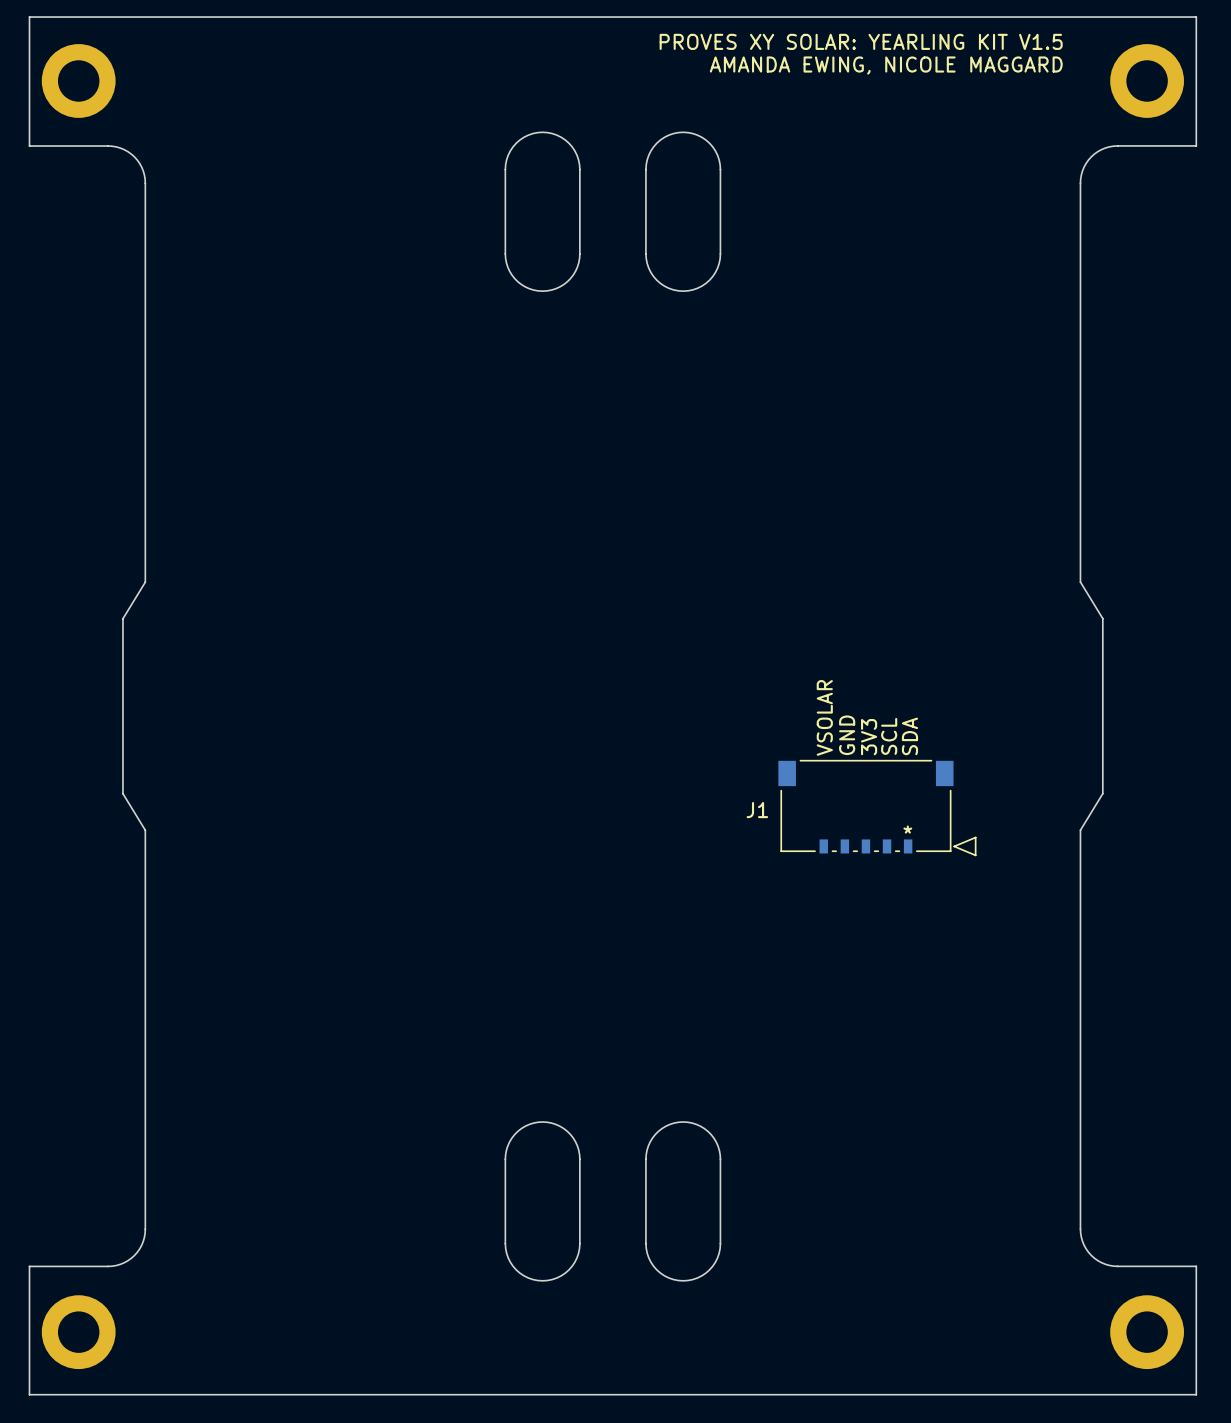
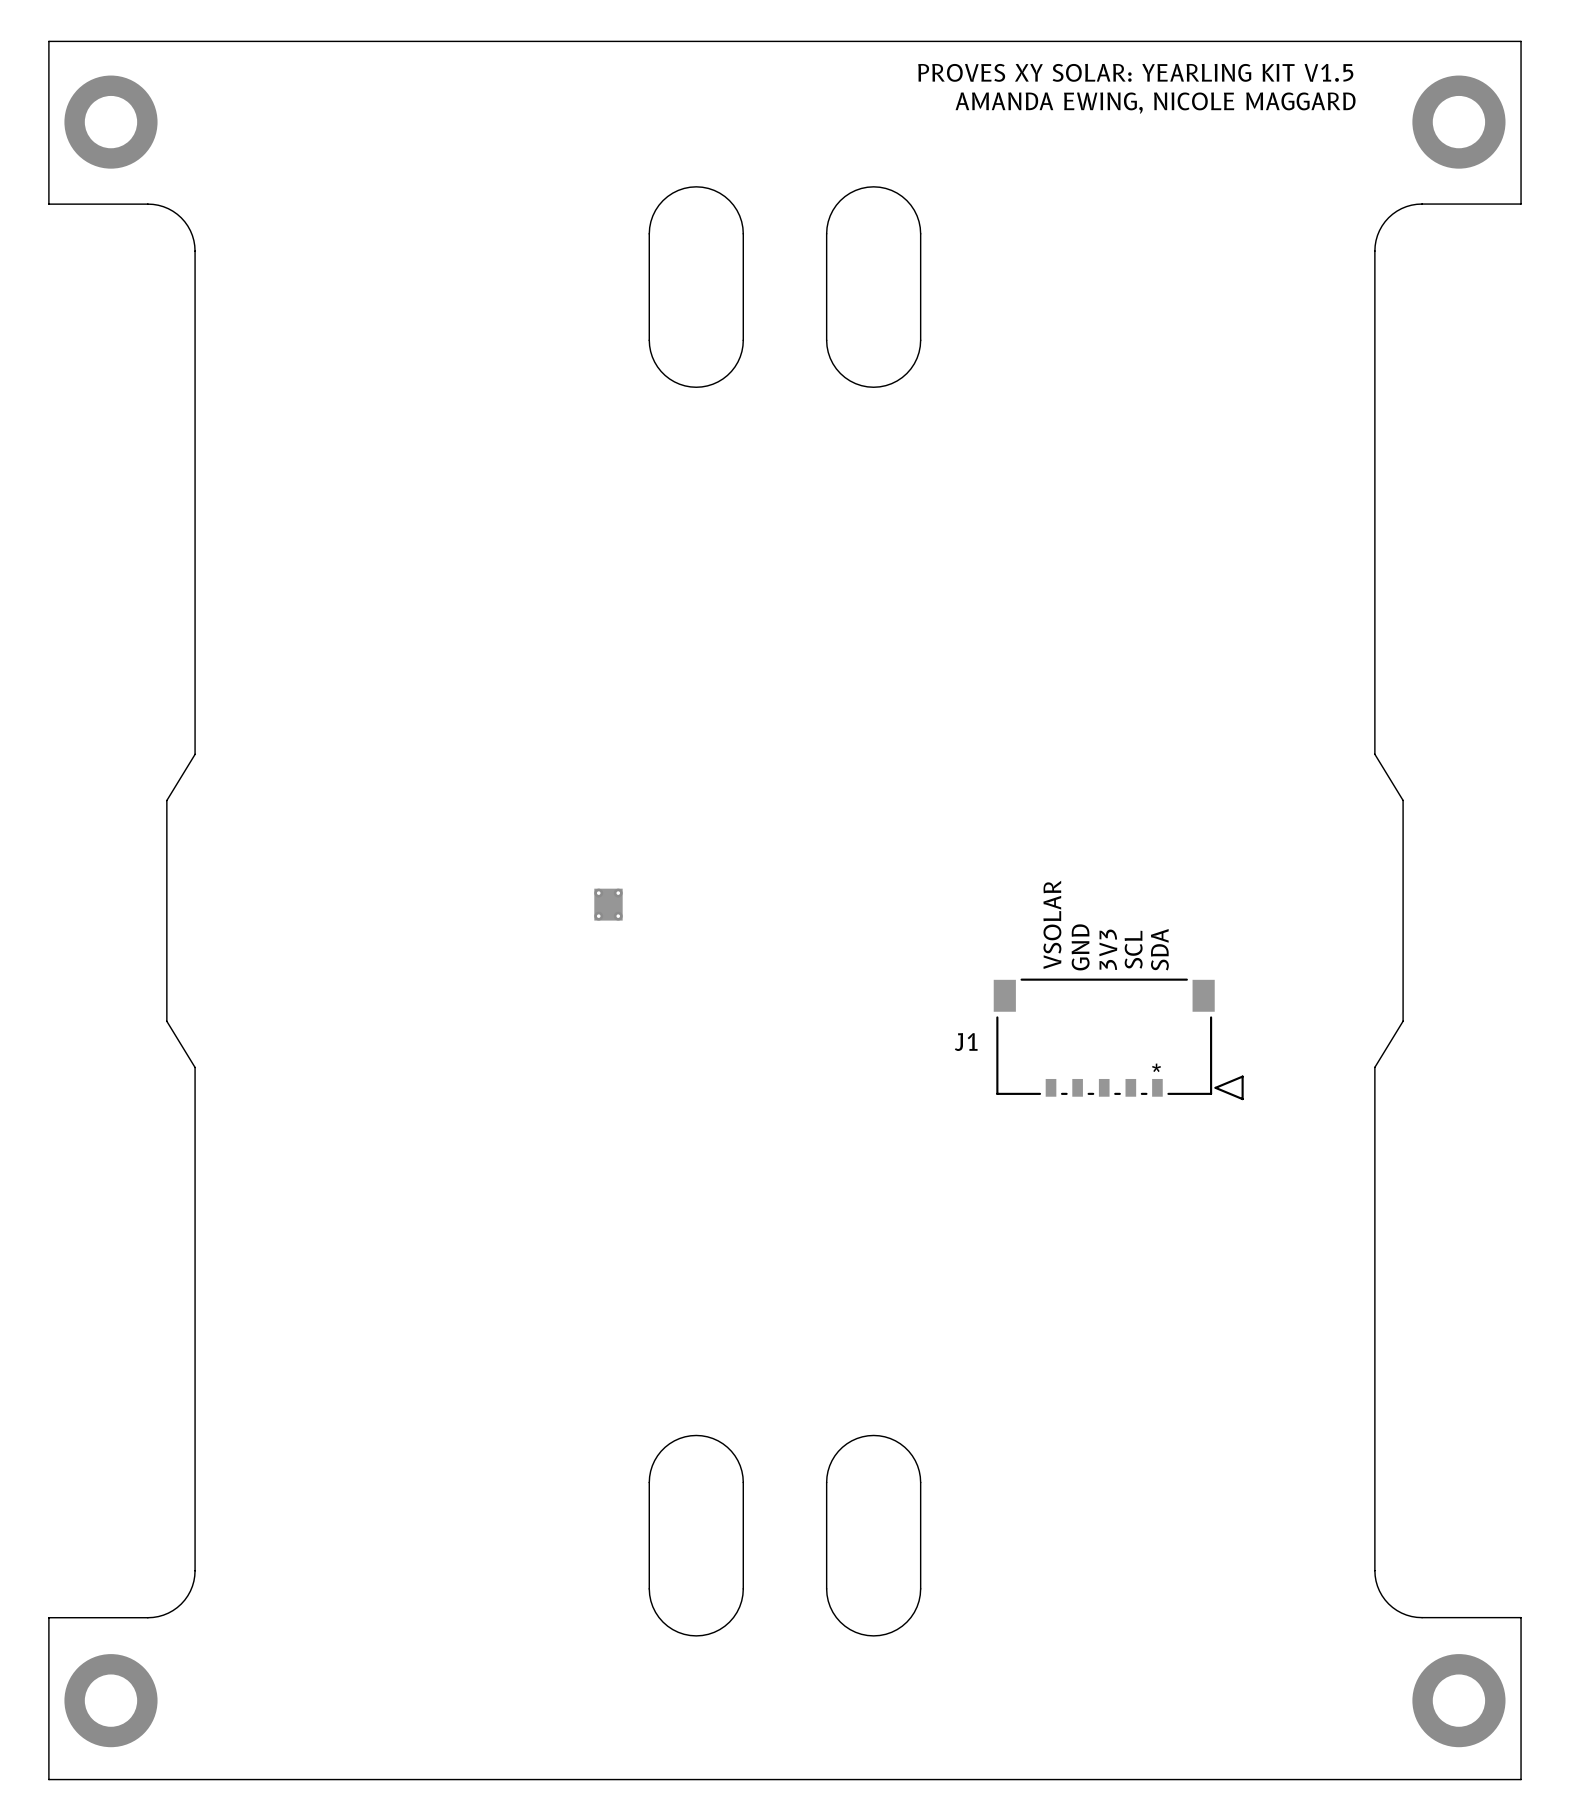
part: none -> (608, 904)

